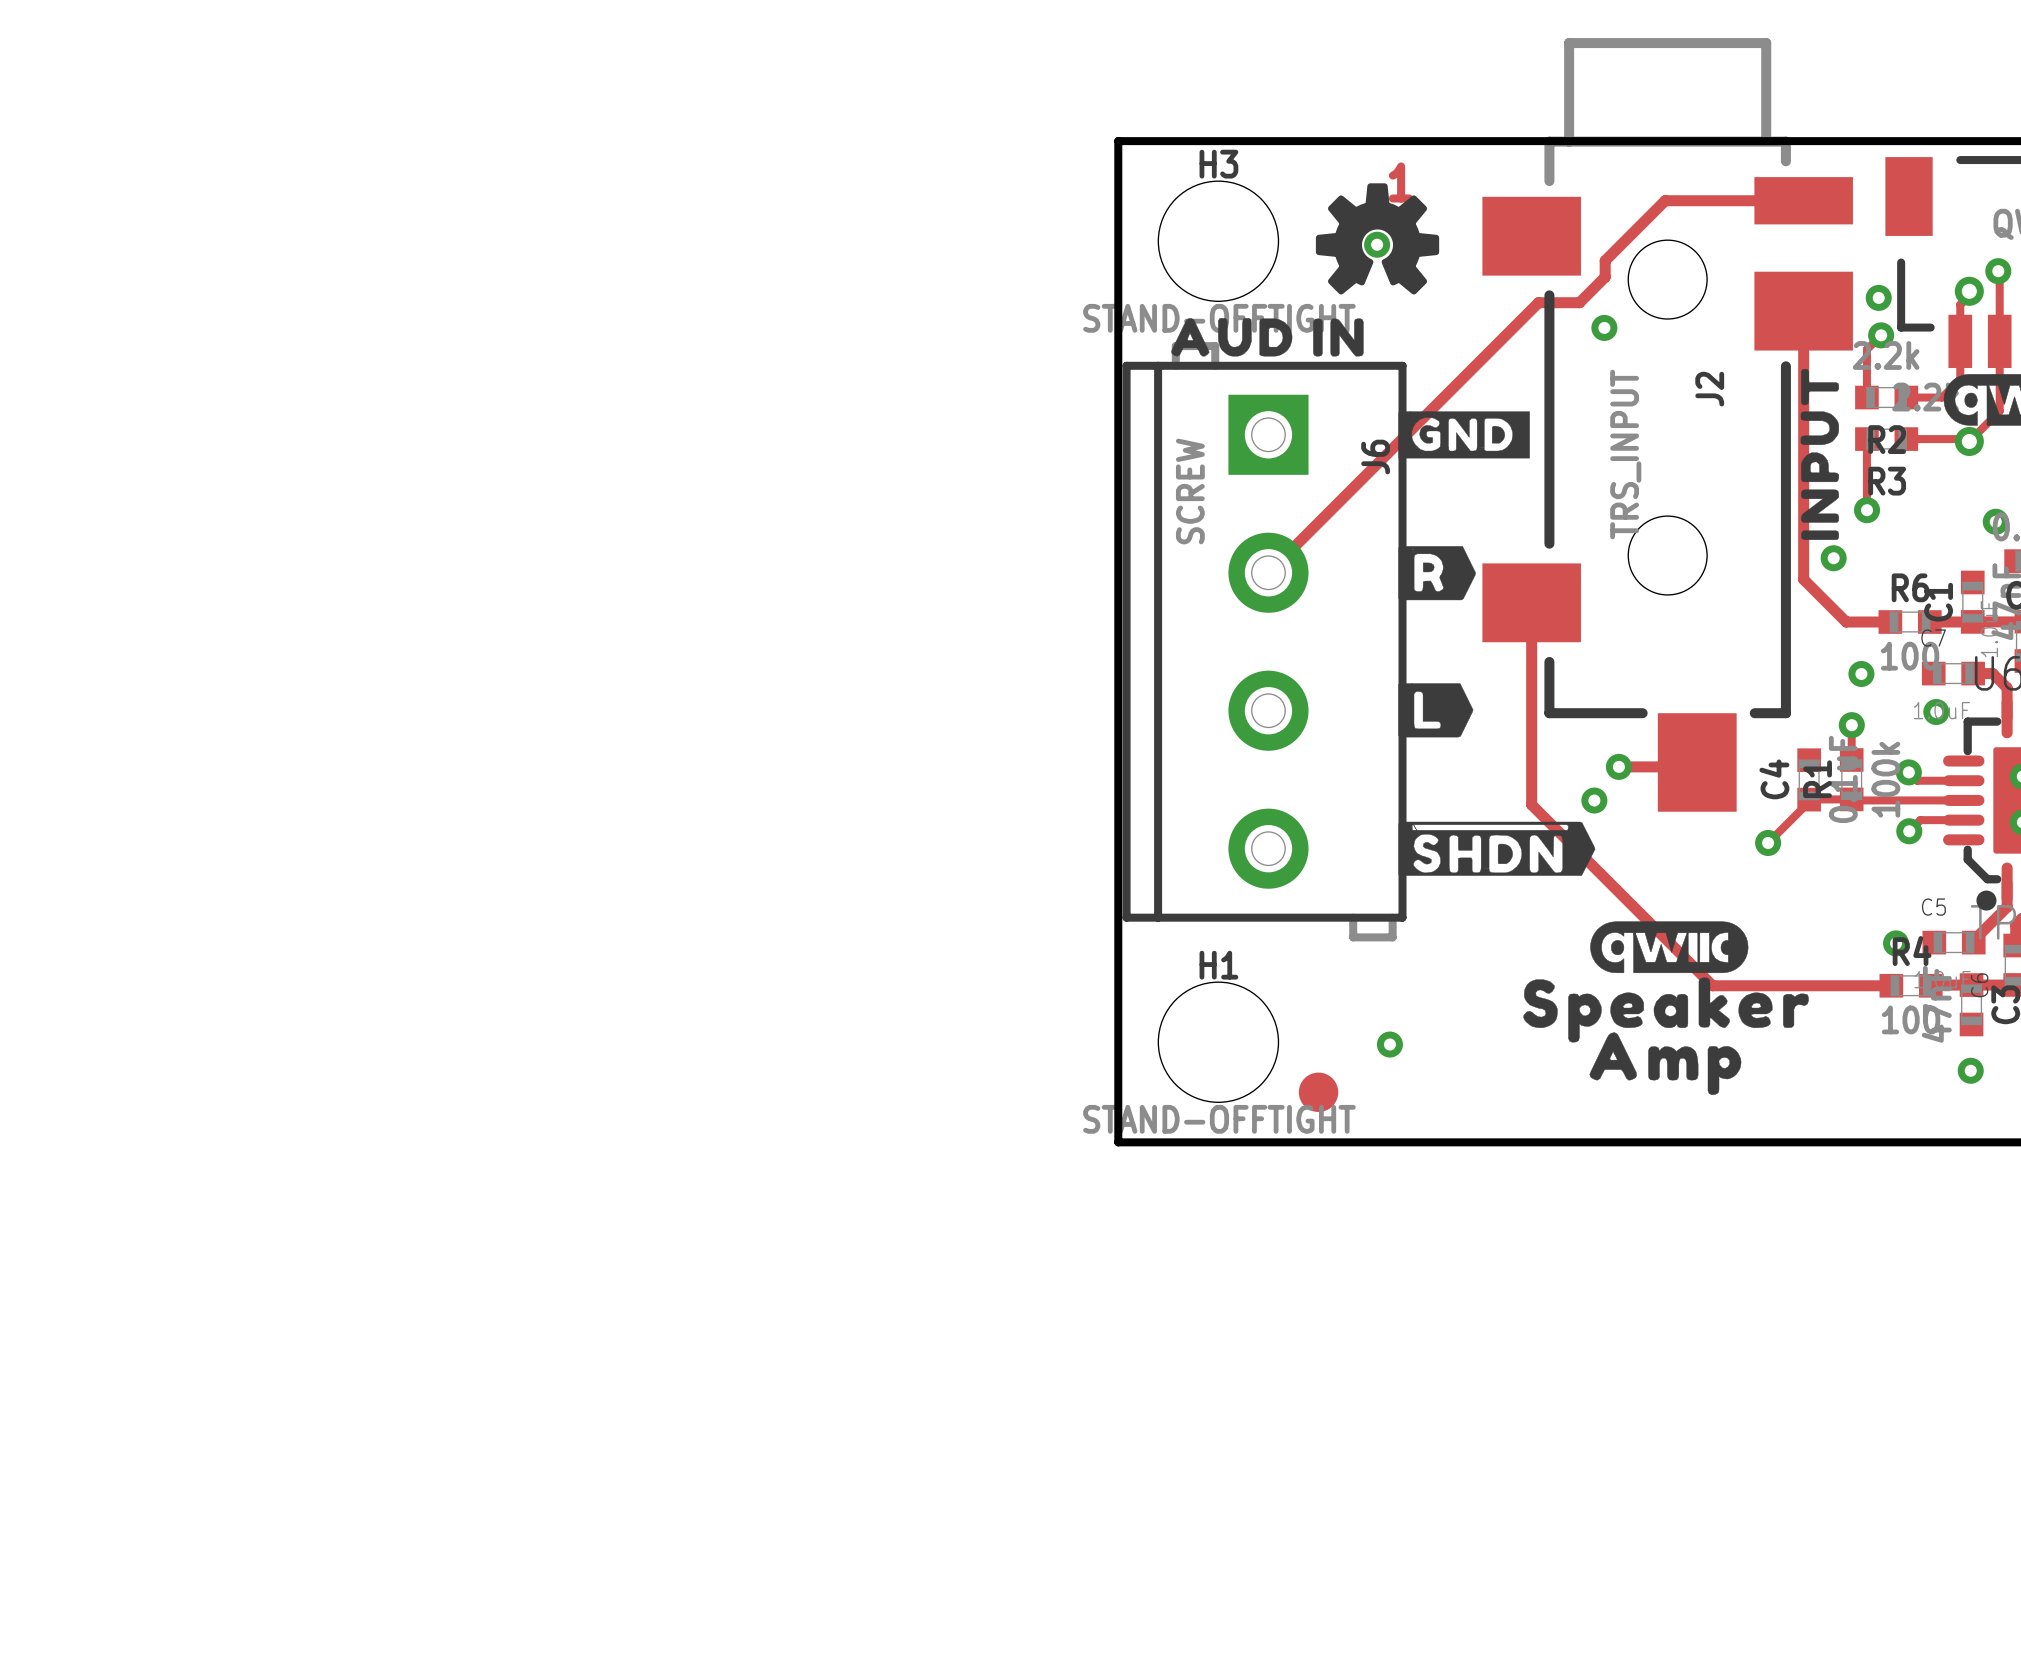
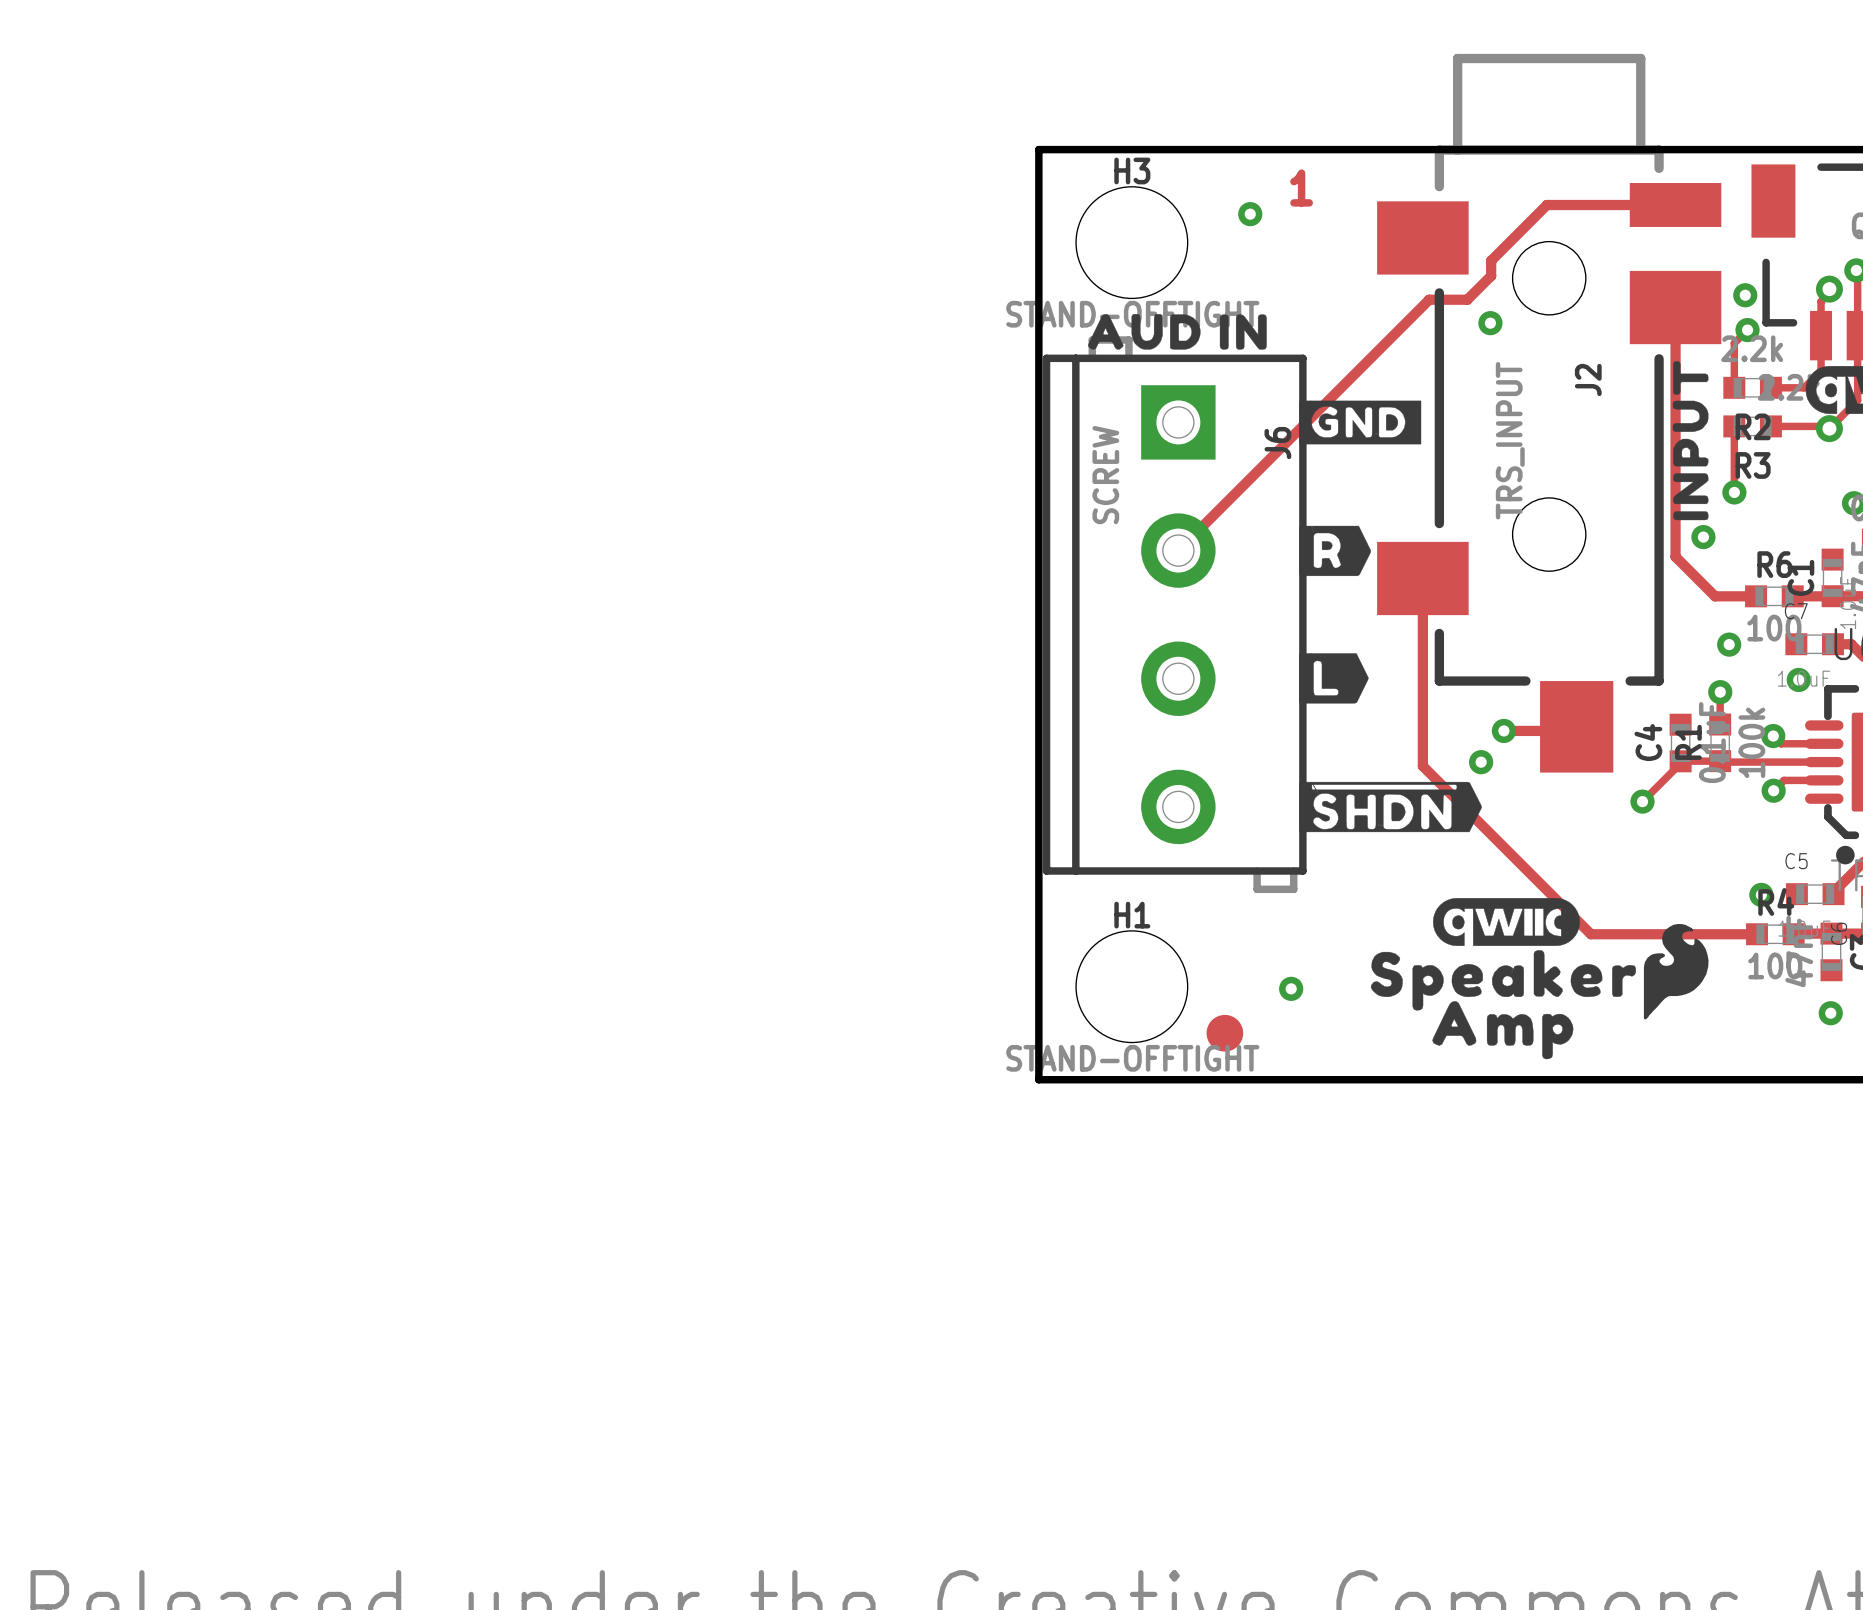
drawing: [1315, 183, 1440, 295] -> none
via position: (1377, 244) -> (1250, 214)
drawing position: (1669, 947) -> (1506, 922)
drawing: none -> [1643, 924, 1709, 1020]
drawing position: (1666, 1010) -> (1503, 980)
drawing position: (1665, 1063) -> (1502, 1030)

